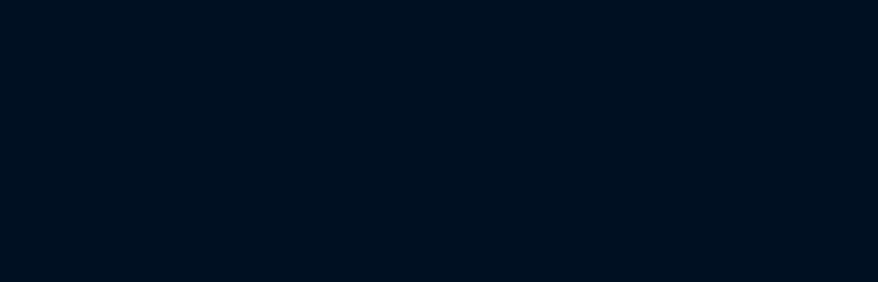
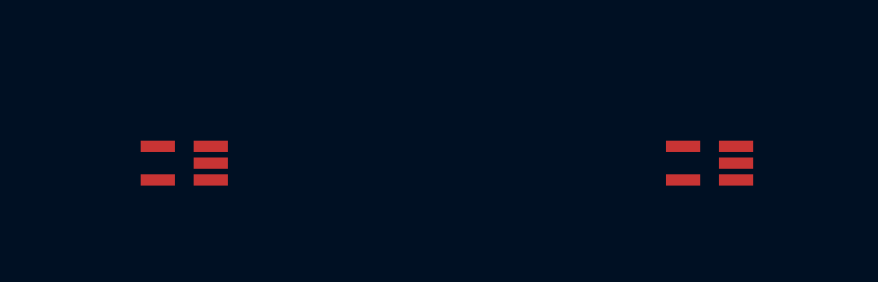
part: none -> (184, 163)
part: none -> (709, 163)

